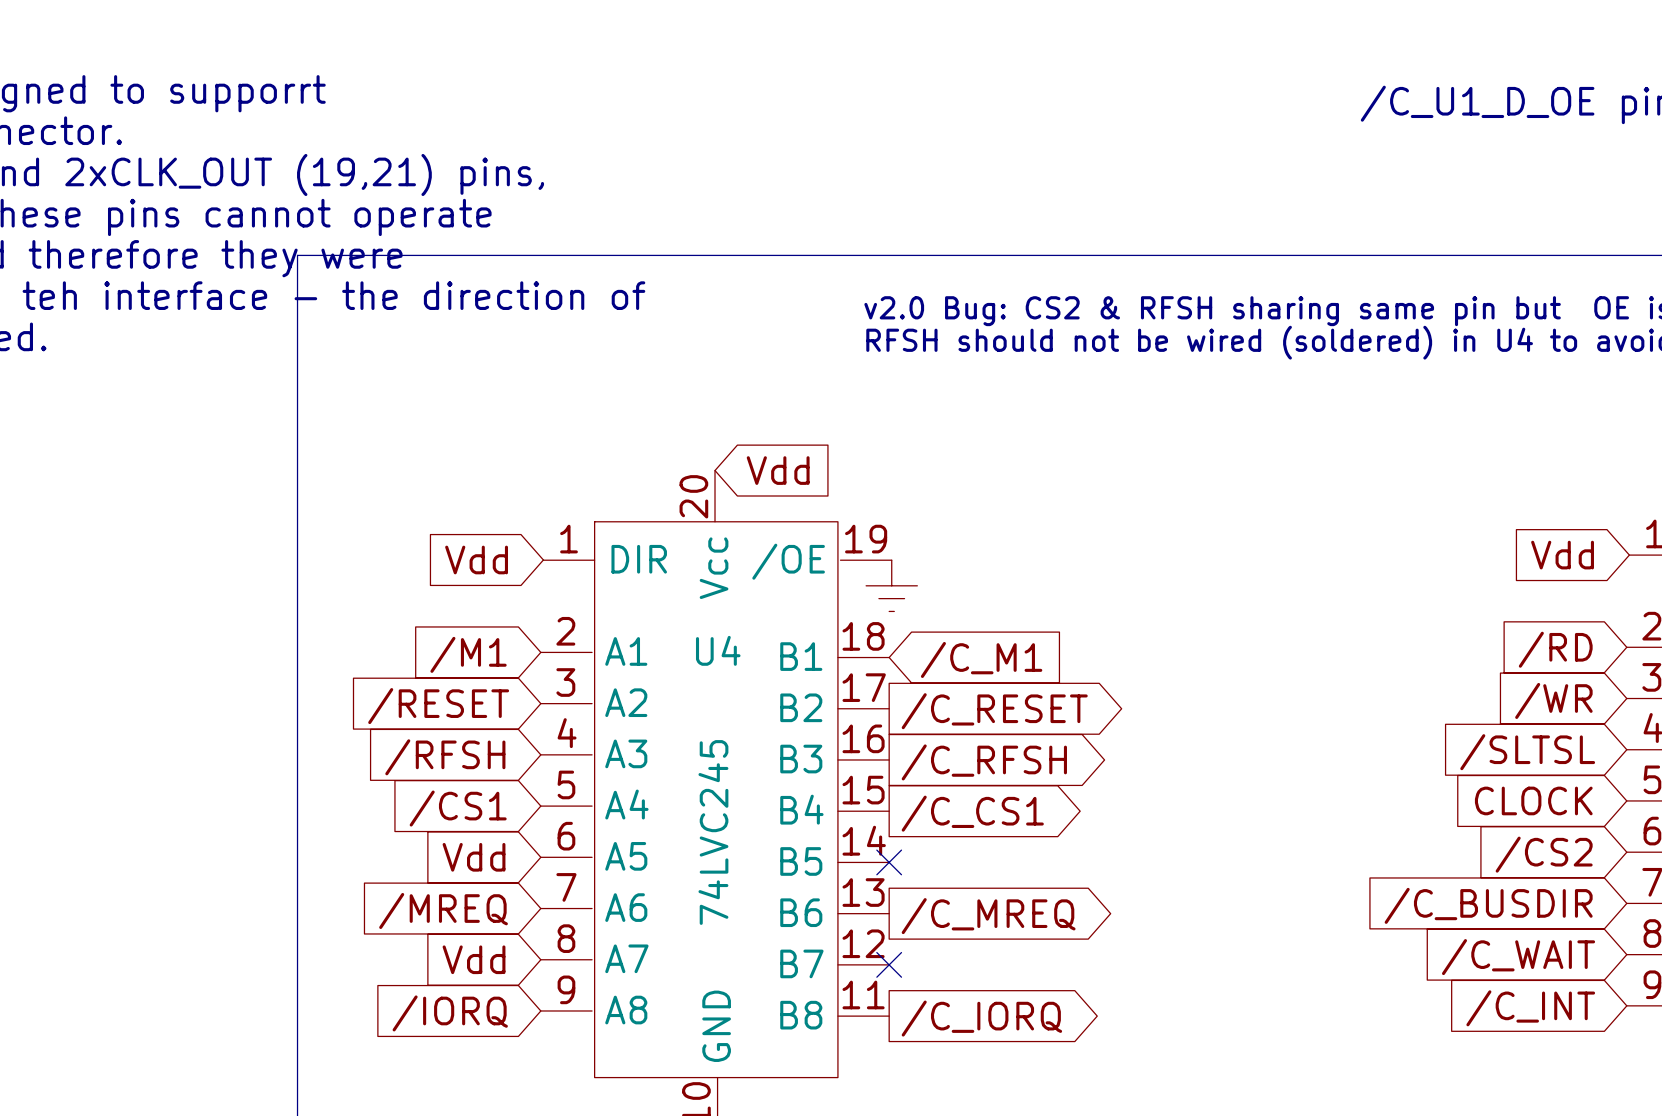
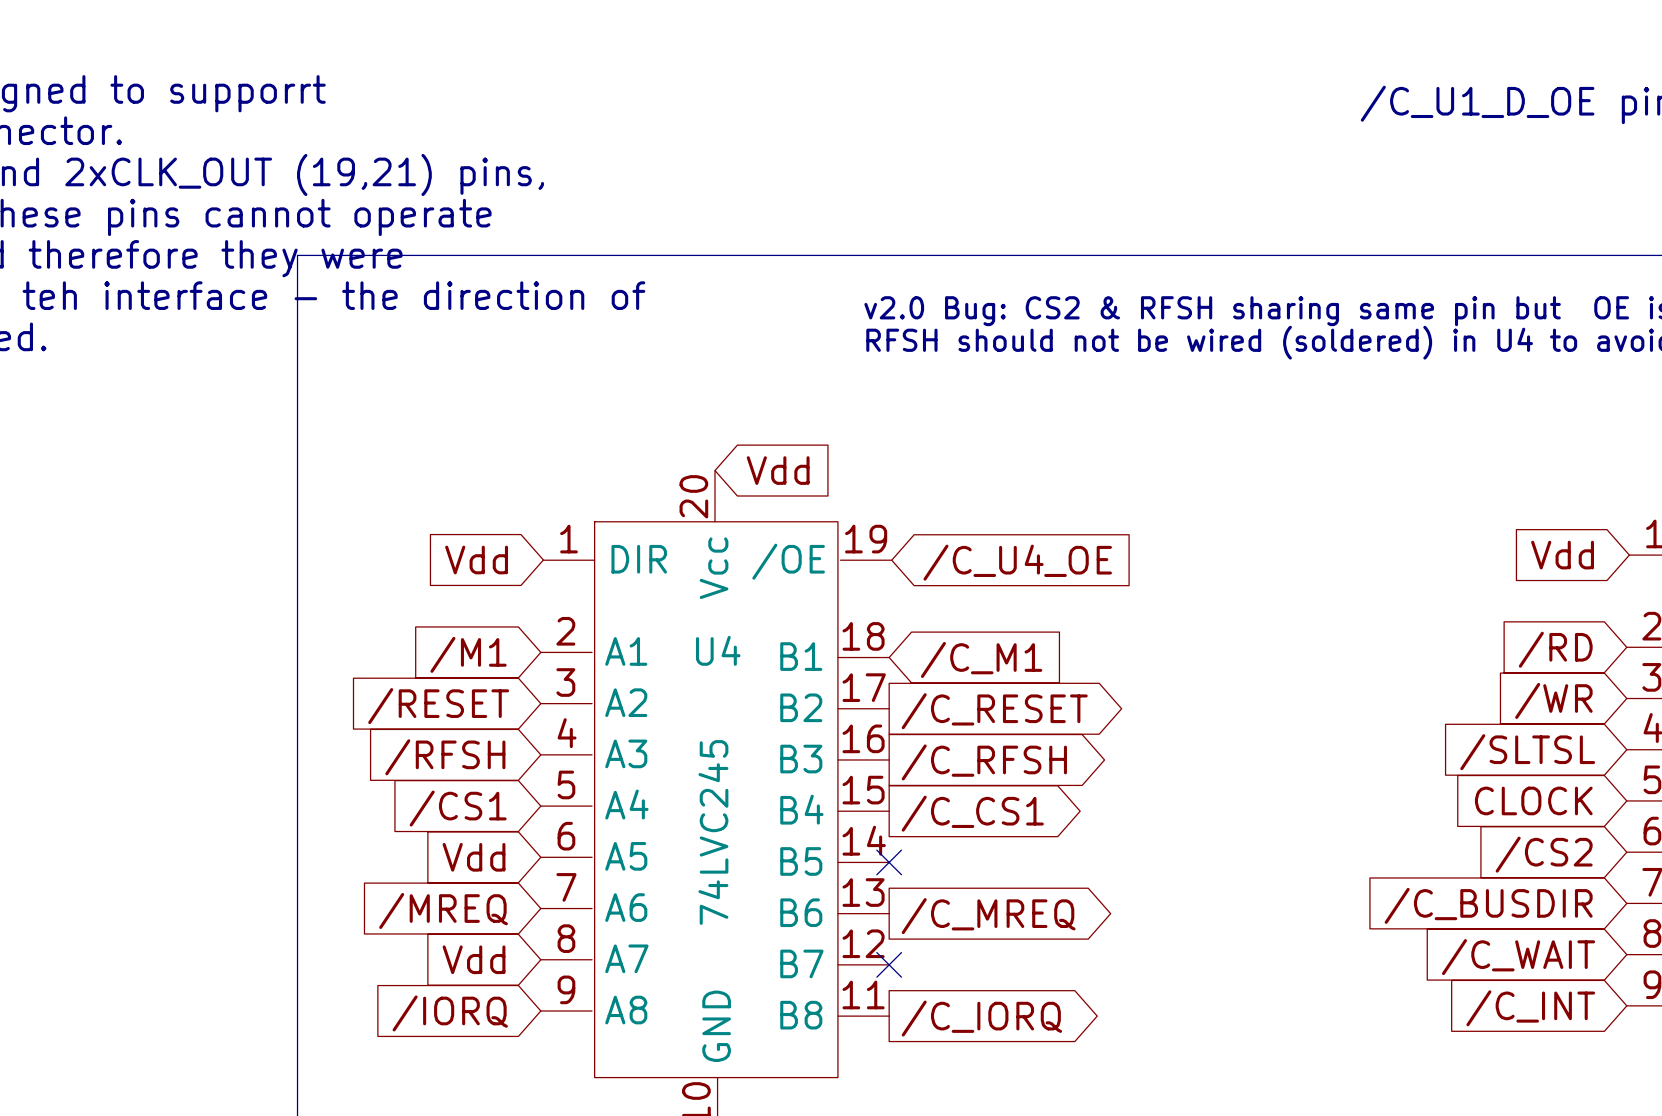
global label: none -> /C_U4_OE (1017, 562)
power symbol: (891, 585) -> none

